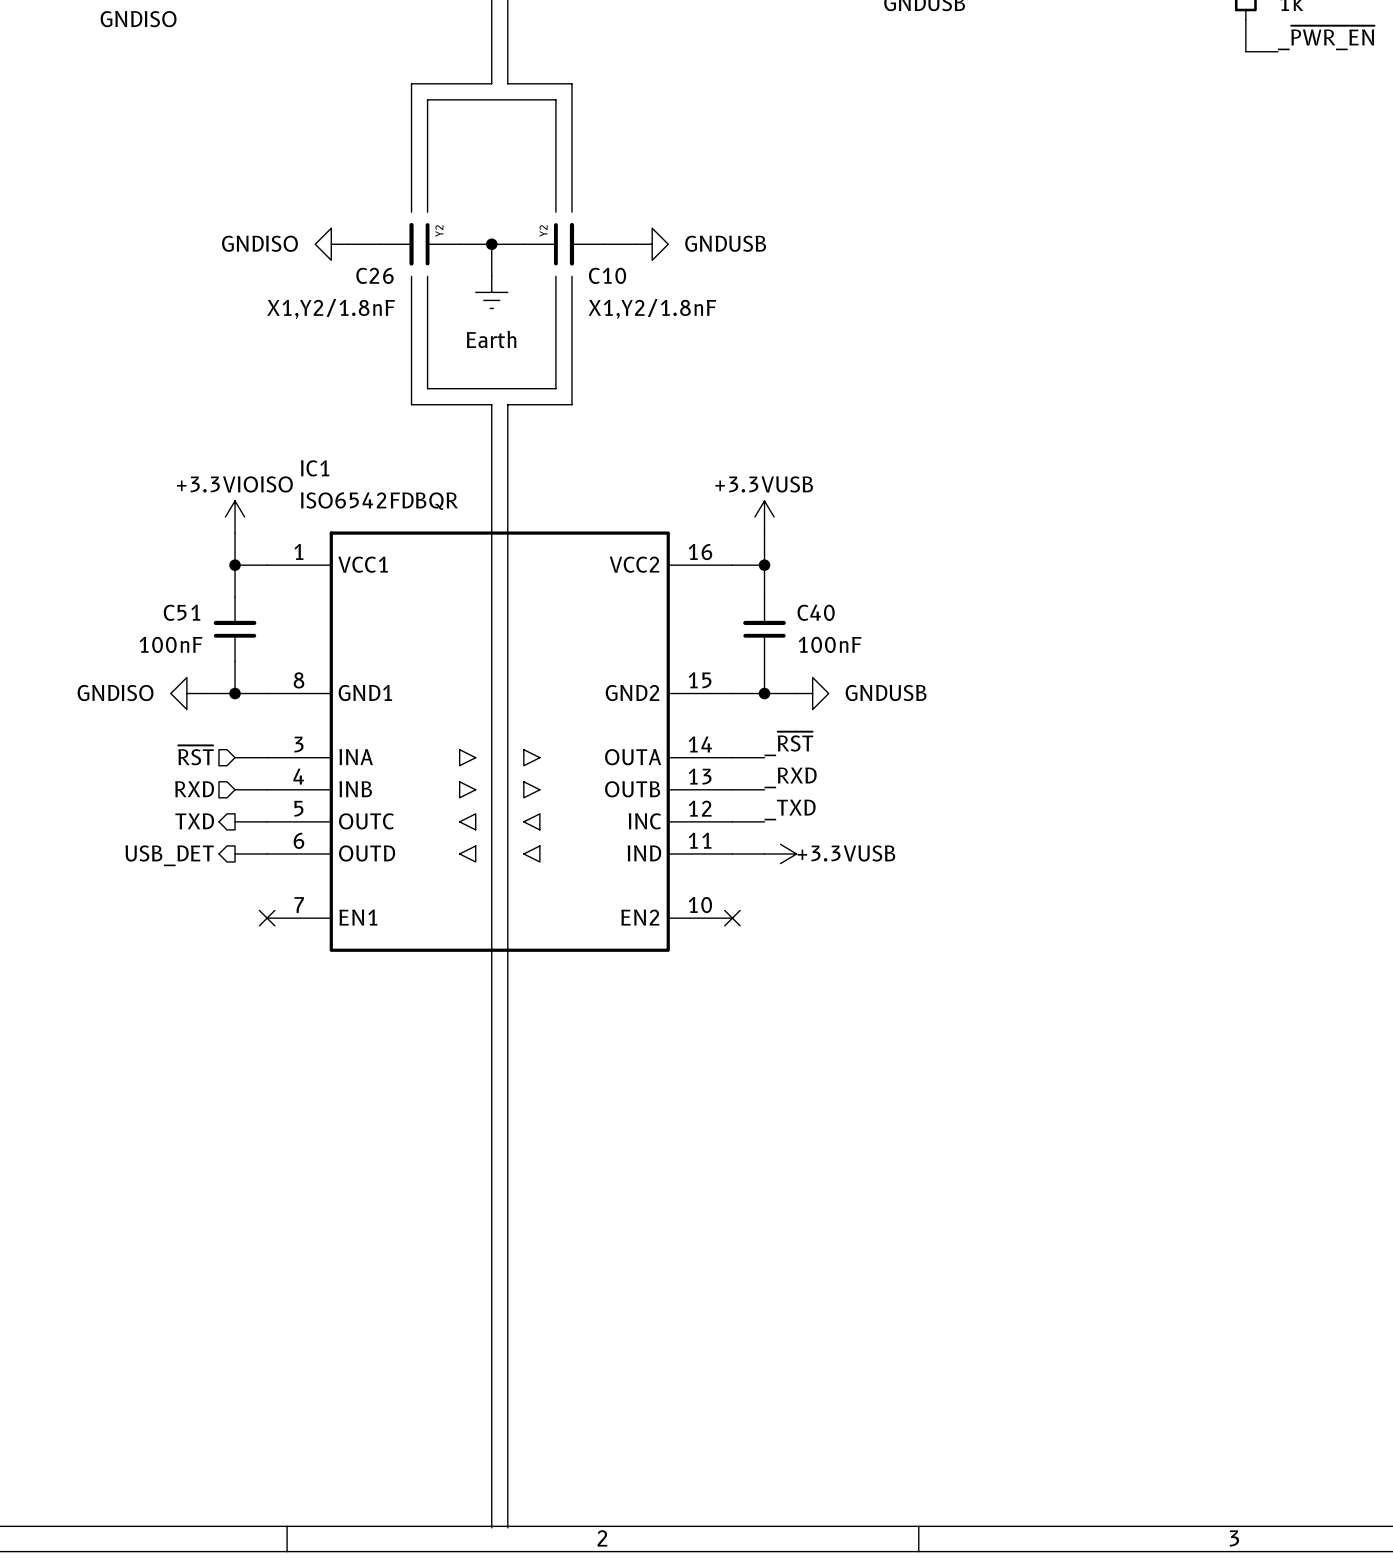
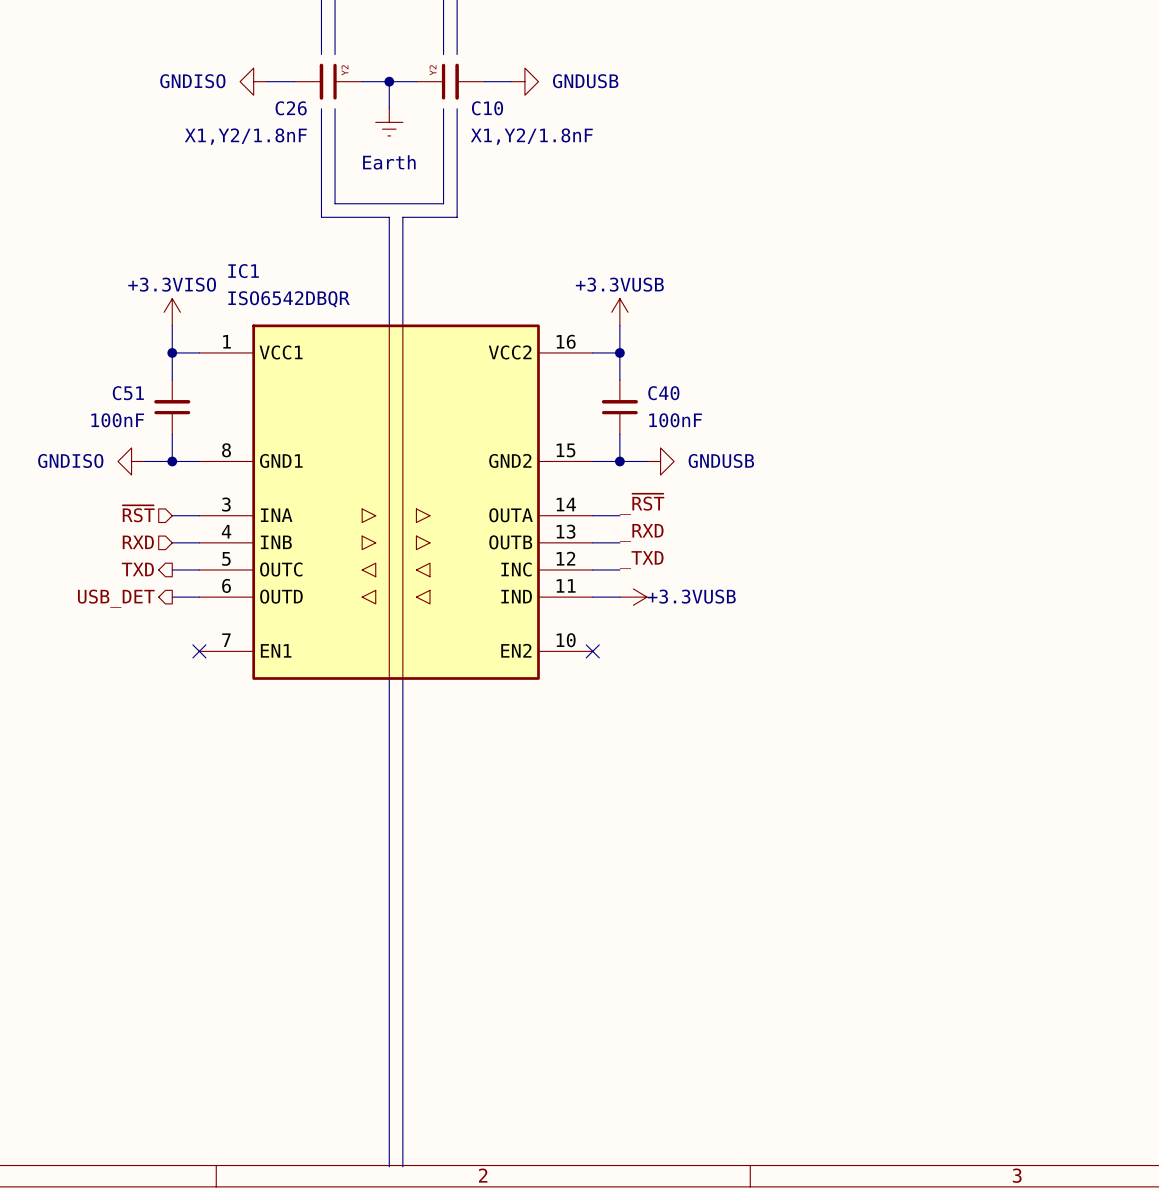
IC1 value: ISO6542FDBQR (379, 501) -> ISO6542DBQR (289, 299)
power symbol: +3.3VIOISO (235, 517) -> +3.3VISO (172, 312)

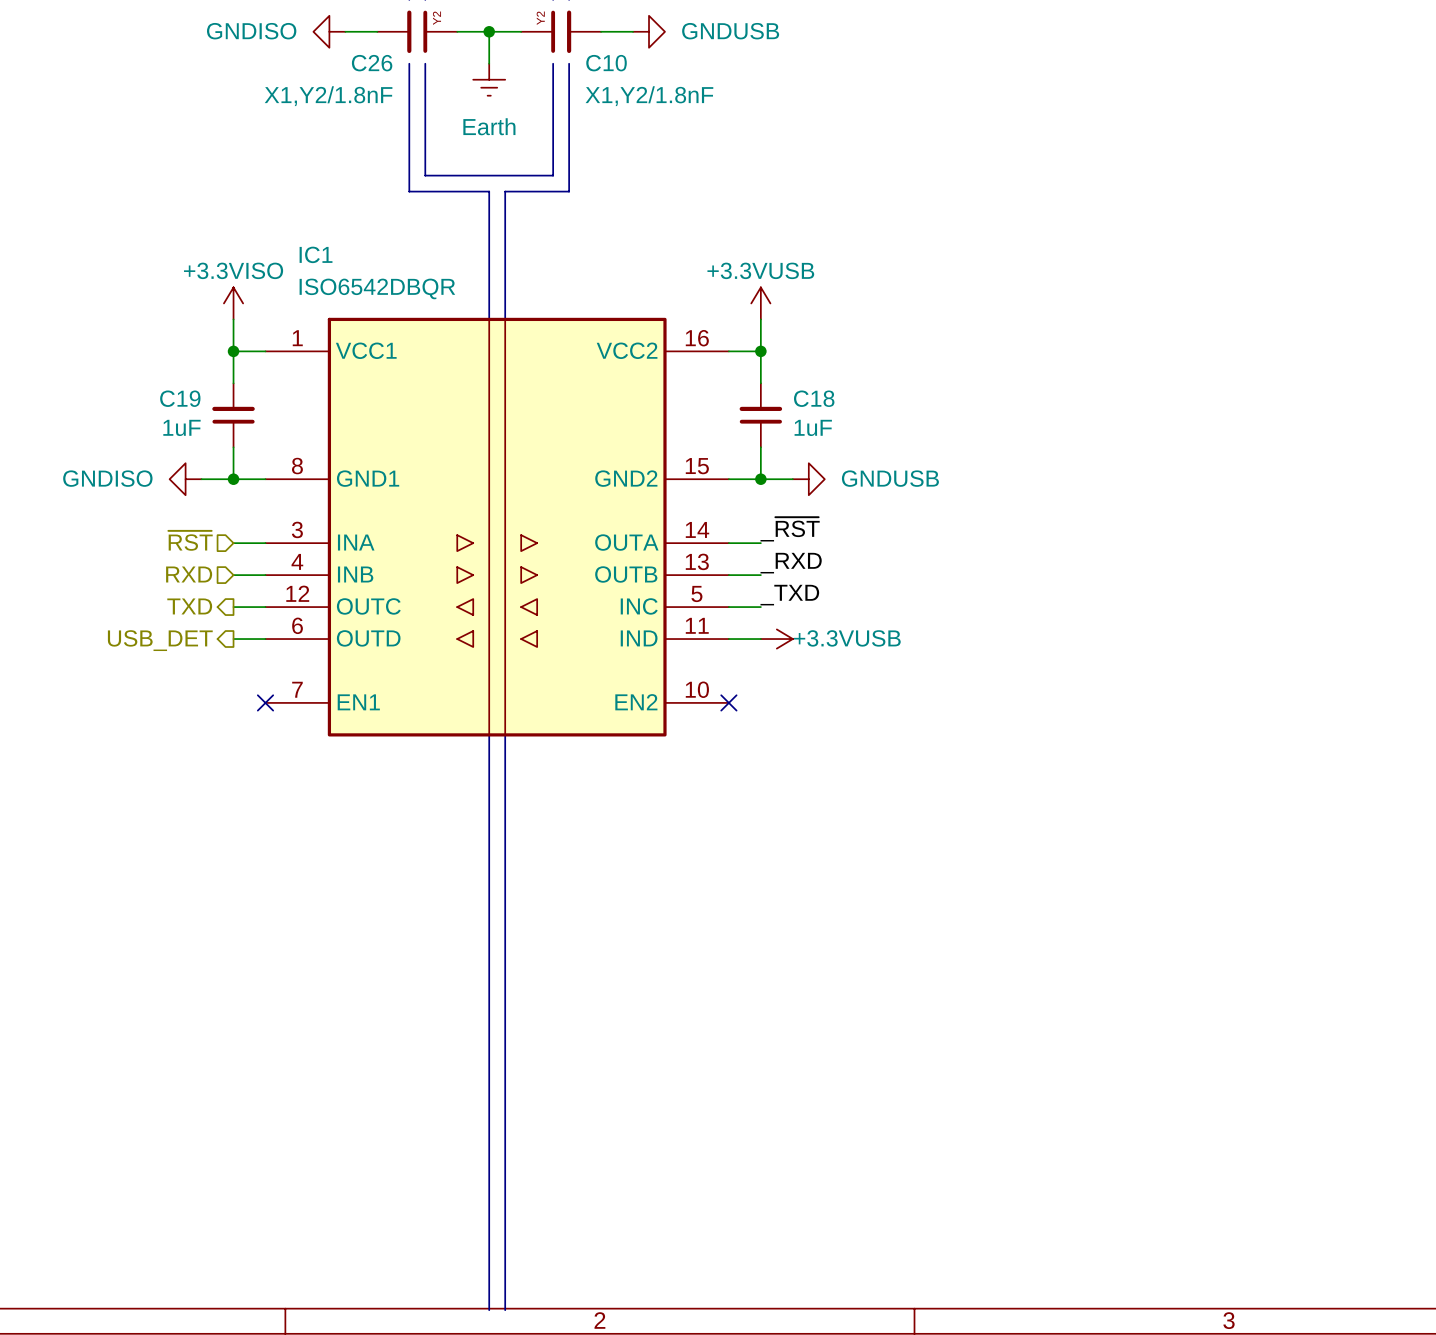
C51 name: C51 (128, 393) -> C19 (180, 398)
C40 name: C40 (663, 393) -> C18 (814, 398)
C51 value: 100nF (117, 420) -> 1uF (181, 427)
C40 value: 100nF (675, 420) -> 1uF (813, 427)
IC1 pin number: 5 (226, 558) -> 12 (297, 593)
IC1 pin number: 12 (565, 558) -> 5 (696, 593)

